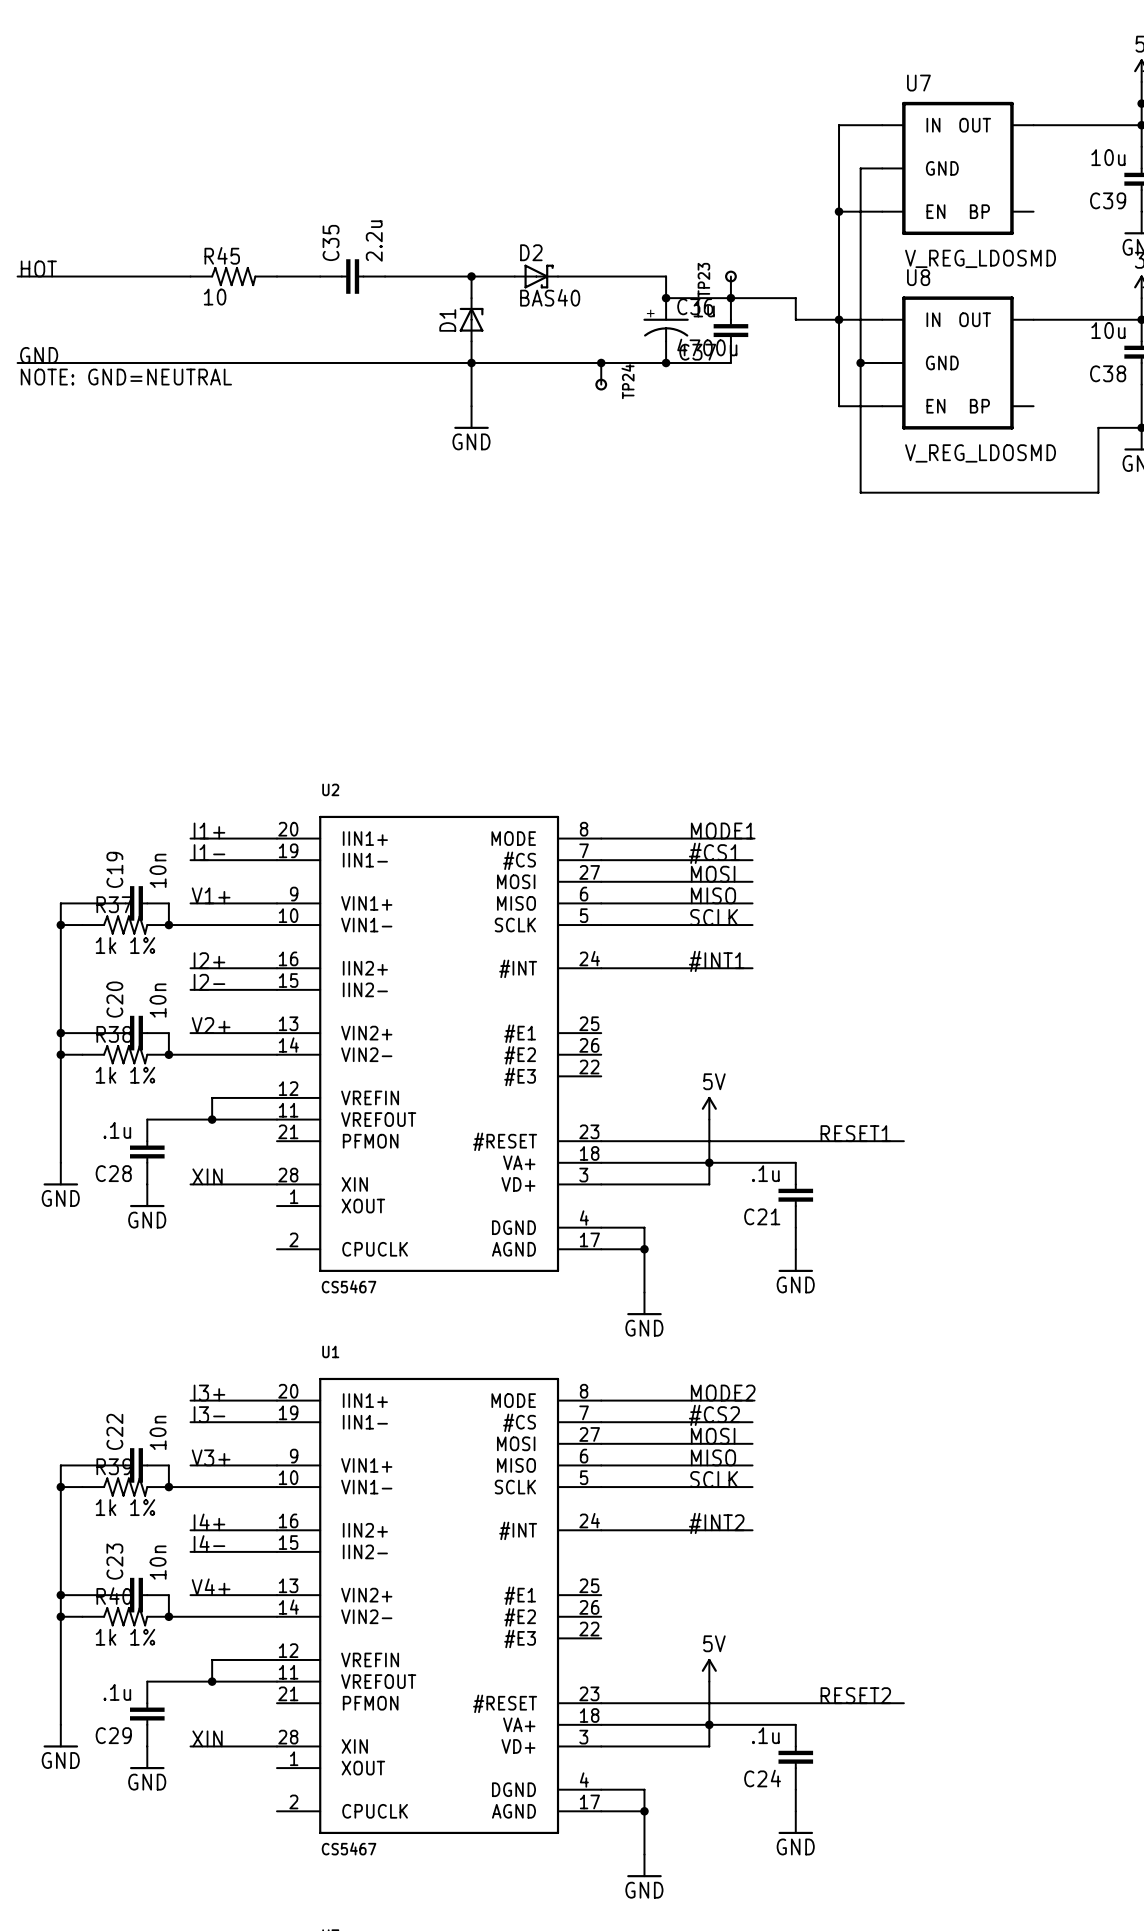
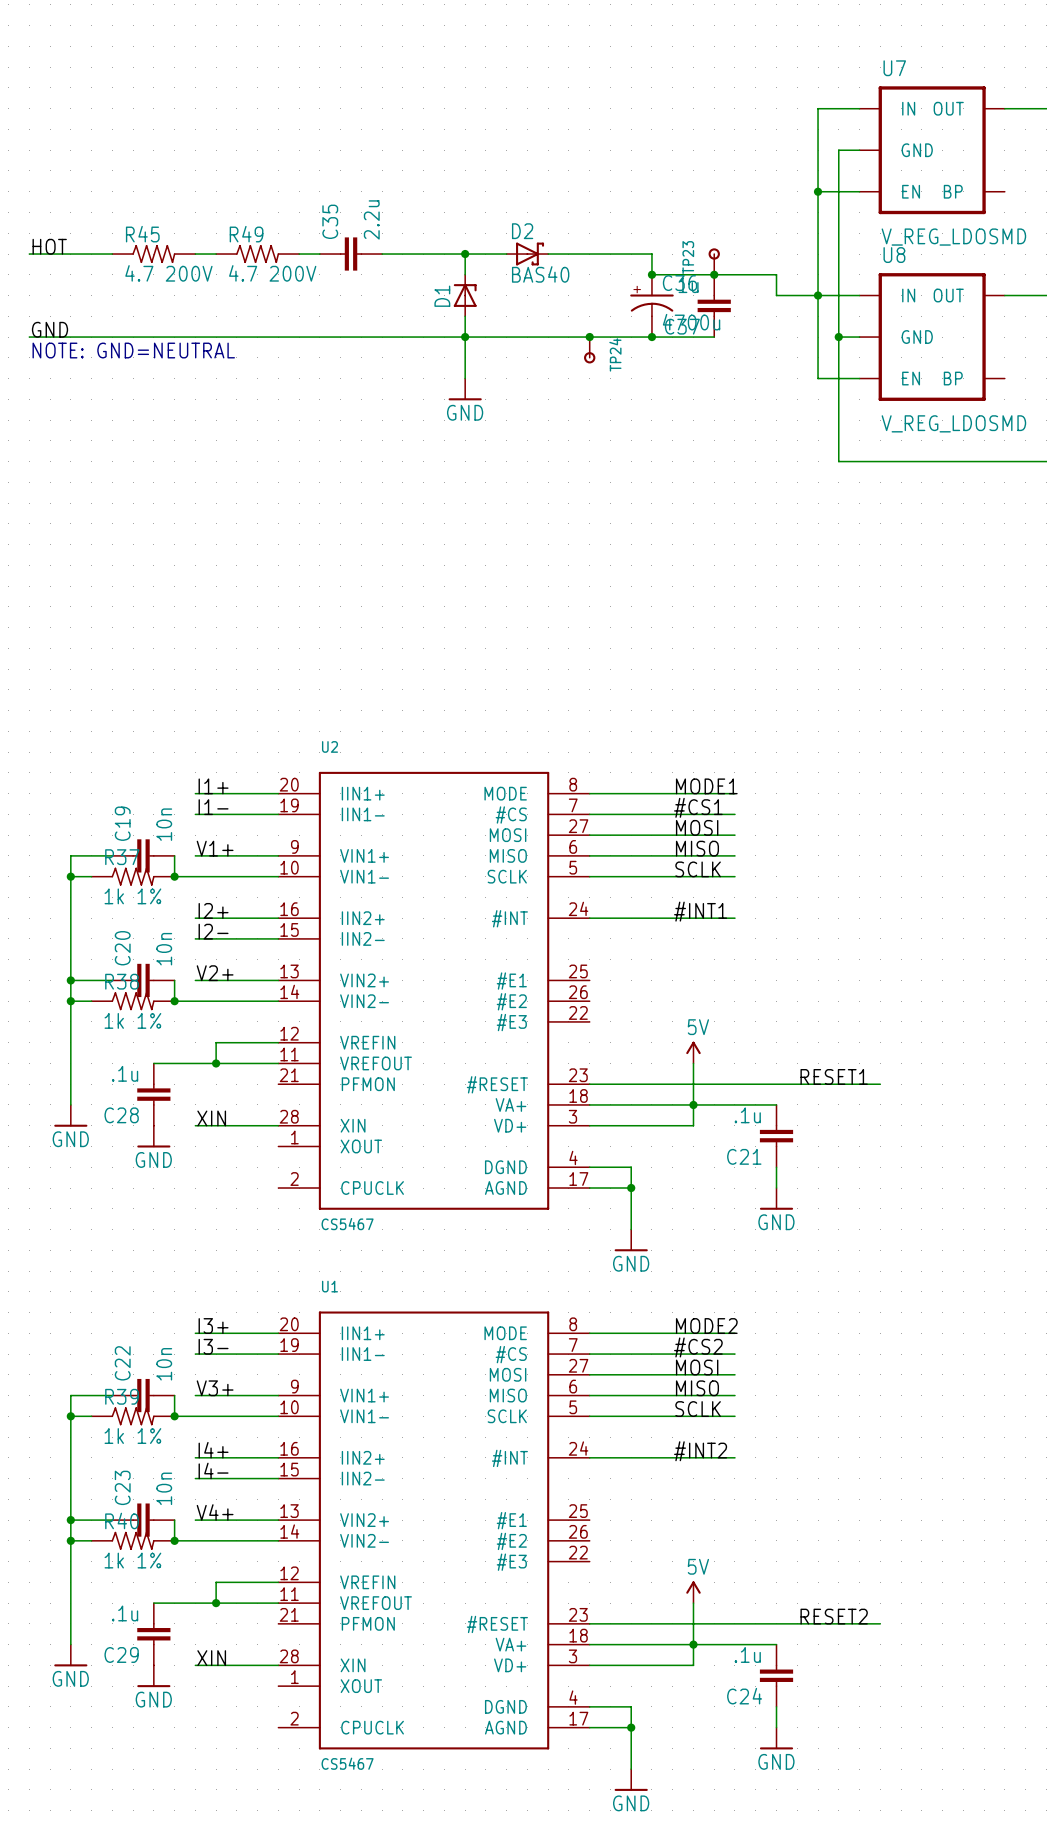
R45 position: (233, 276) -> (153, 254)
R49: none -> 4.7 200V (257, 254)
R45 value: 10 (215, 297) -> 4.7 200V (168, 273)

